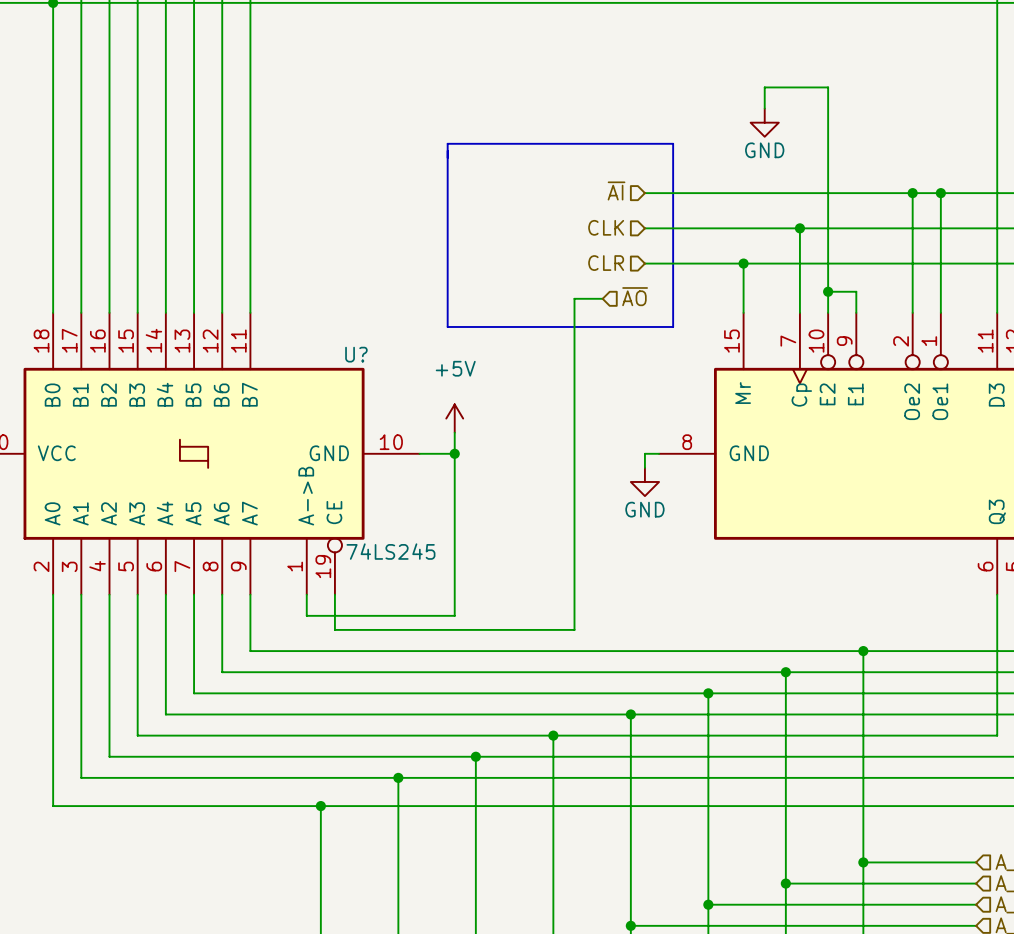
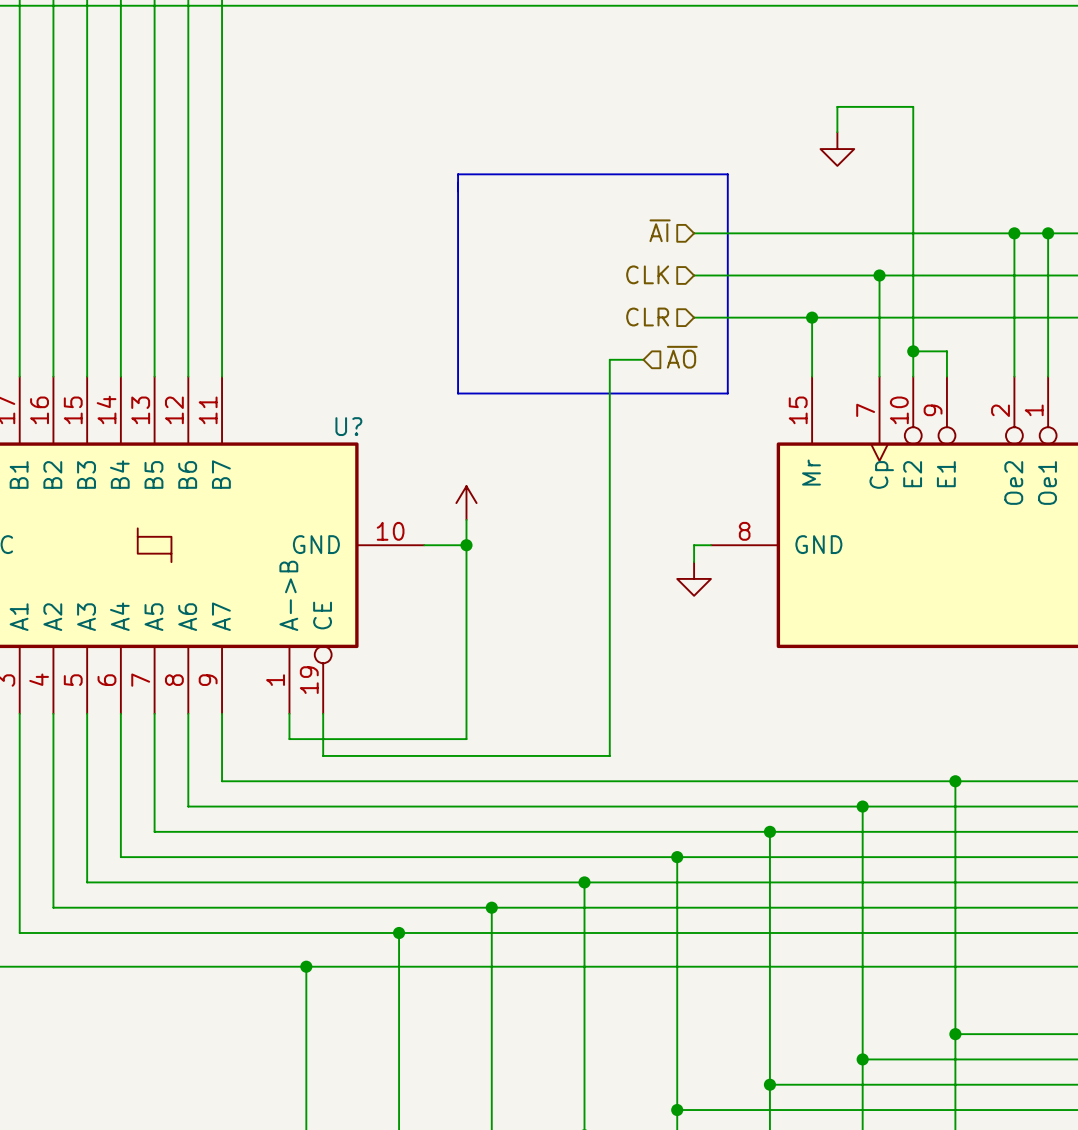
power symbol text: GND (764, 150) -> none
power symbol text: +5V (455, 368) -> none
power symbol text: GND (644, 509) -> none
U? value: 74LS245 (390, 551) -> none

